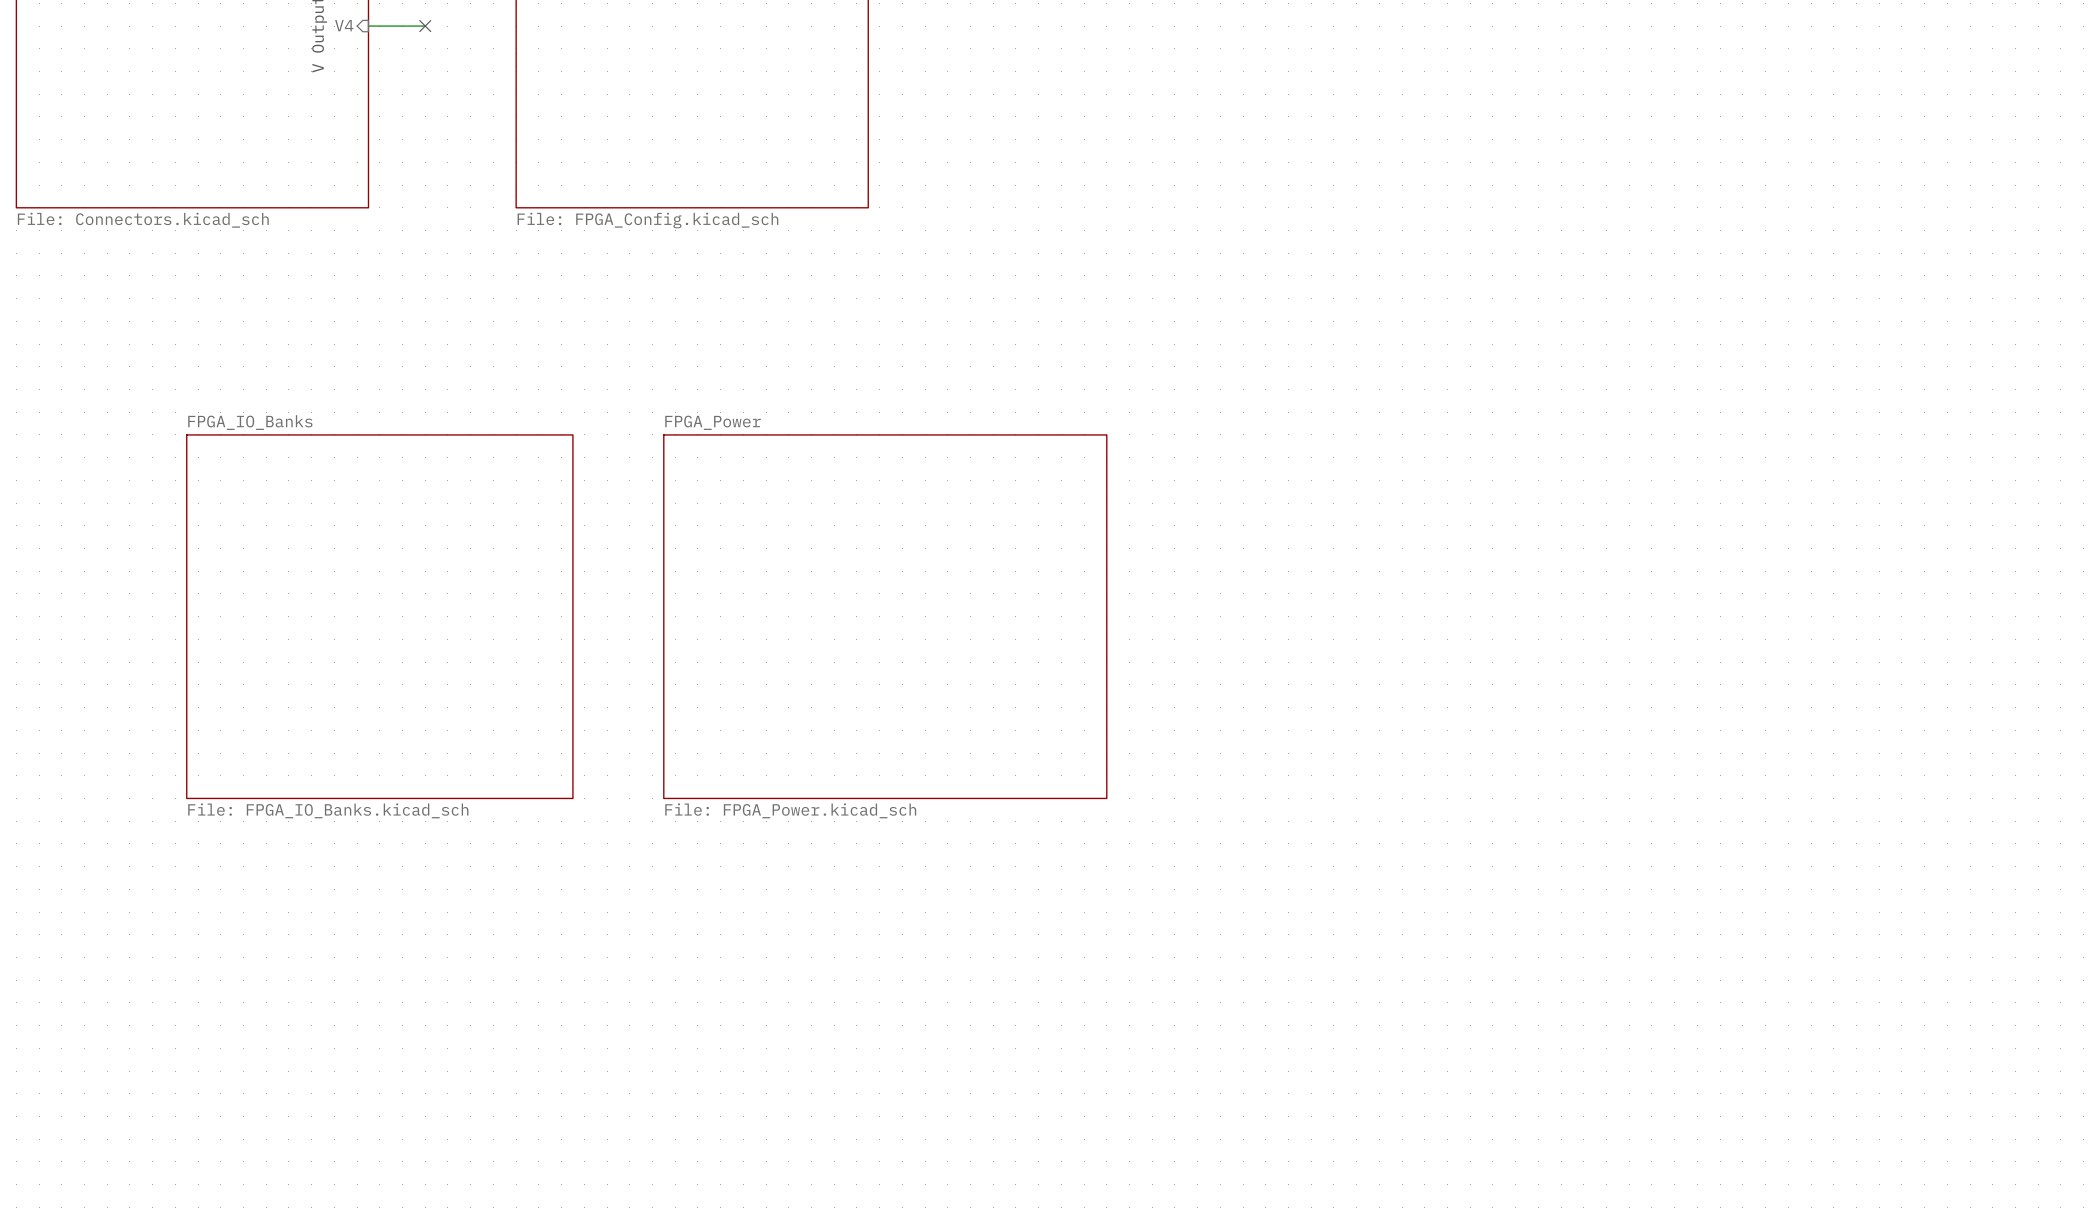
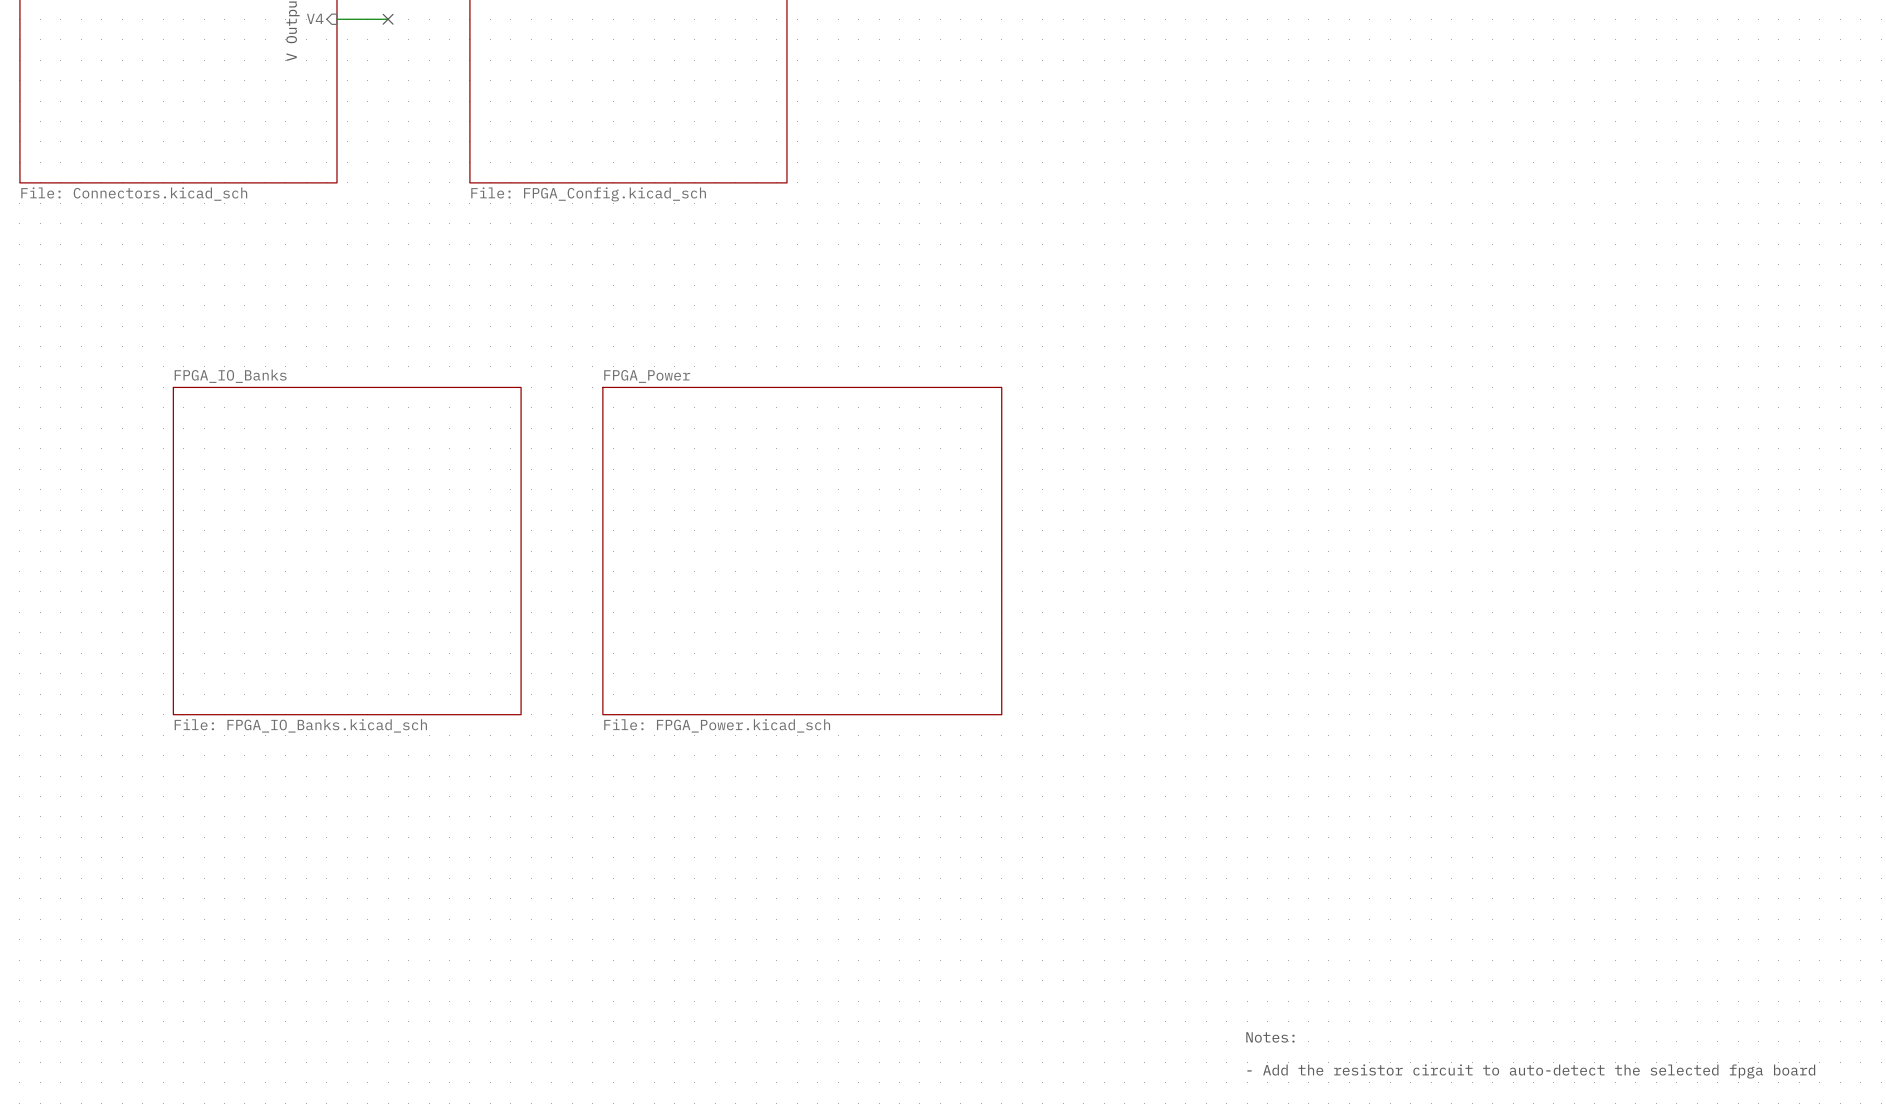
text: none -> Notes: (1270, 1037)
text: none -> - Add the resistor circuit to auto-detect the selected fpga board (1531, 1071)

